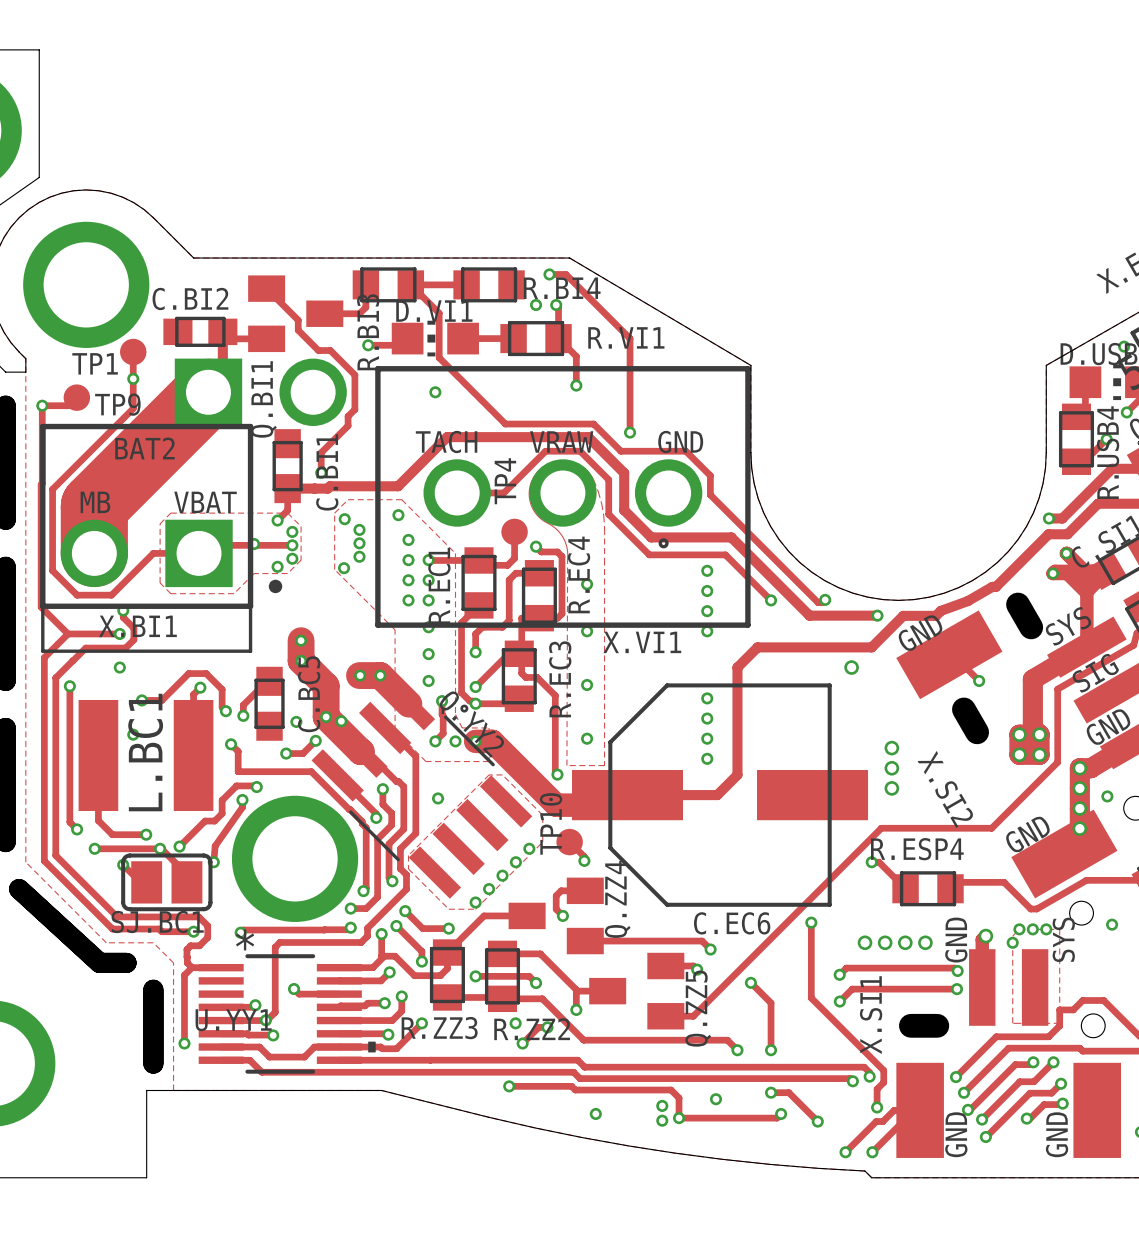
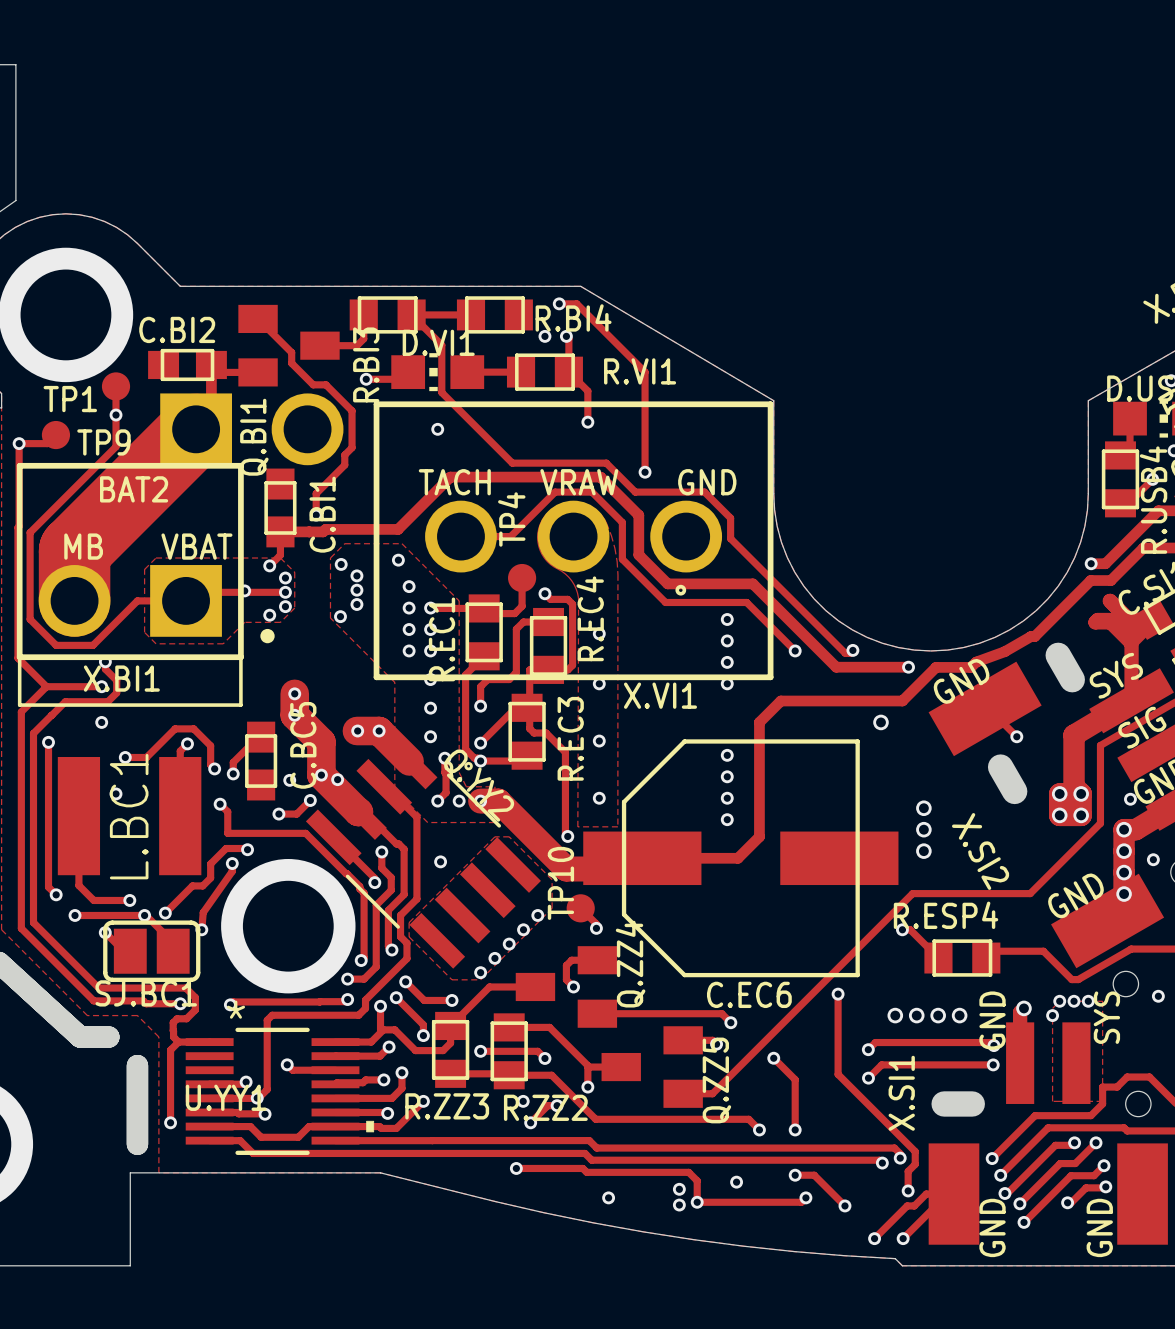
via: (1066, 553) -> none
via: (1052, 573) -> none
via: none -> (1130, 799)

